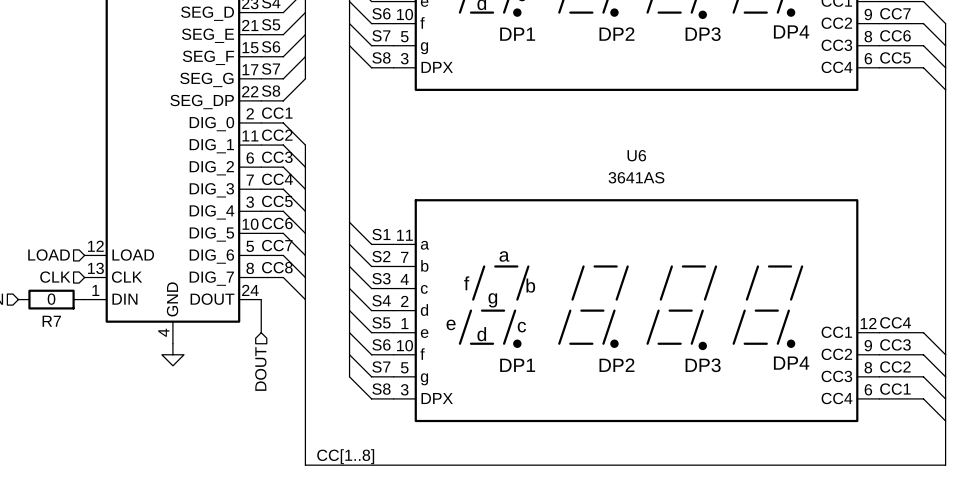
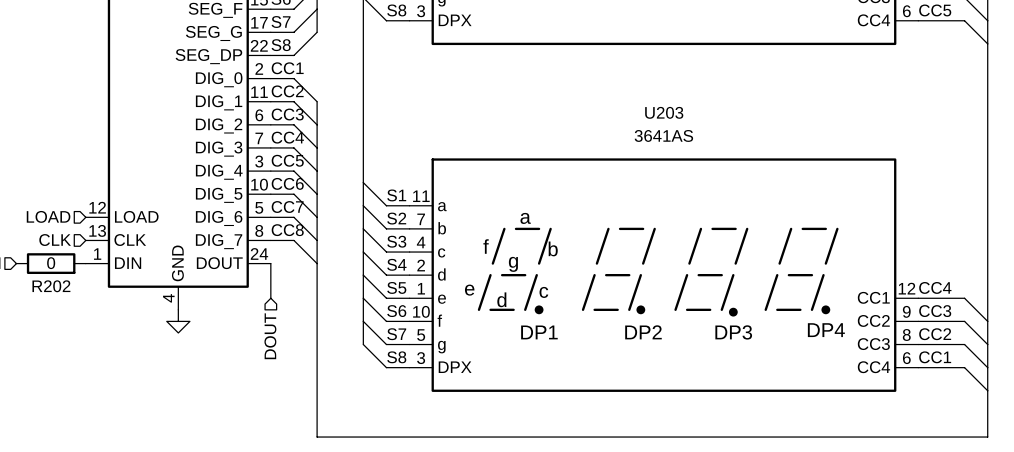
U6 name: U6 (636, 155) -> U203 (664, 112)
R7 name: R7 (51, 321) -> R202 (51, 286)
label: CC[1..8] (345, 456) -> none

